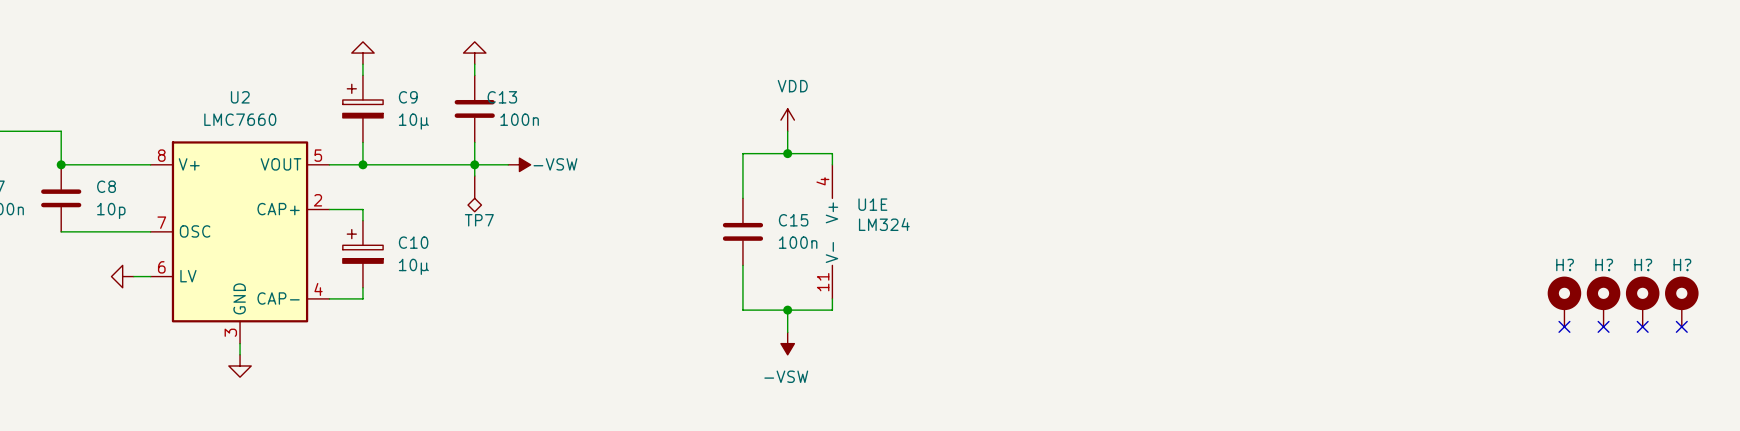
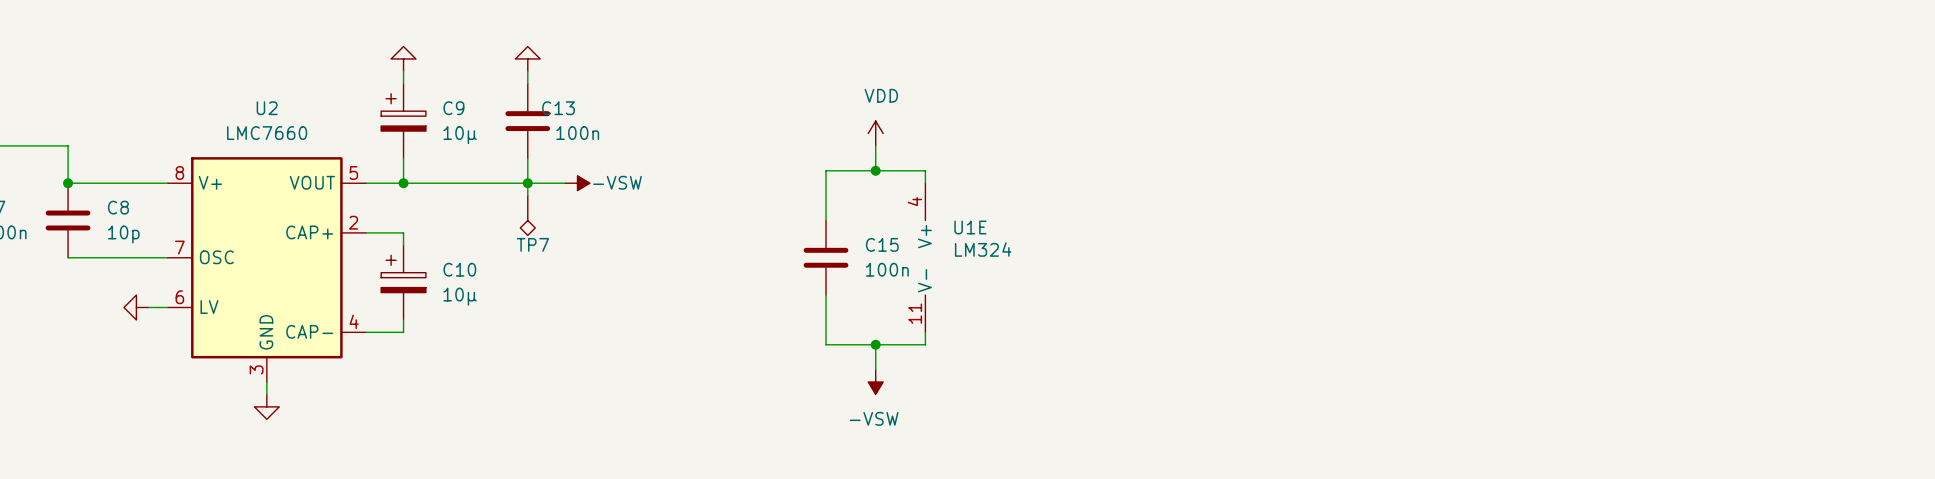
H?: (1564, 301) -> none
H?: (1603, 301) -> none
H?: (1642, 301) -> none
H?: (1681, 301) -> none
no-connect mark: (1564, 326) -> none
no-connect mark: (1603, 326) -> none
no-connect mark: (1642, 326) -> none
no-connect mark: (1681, 326) -> none

